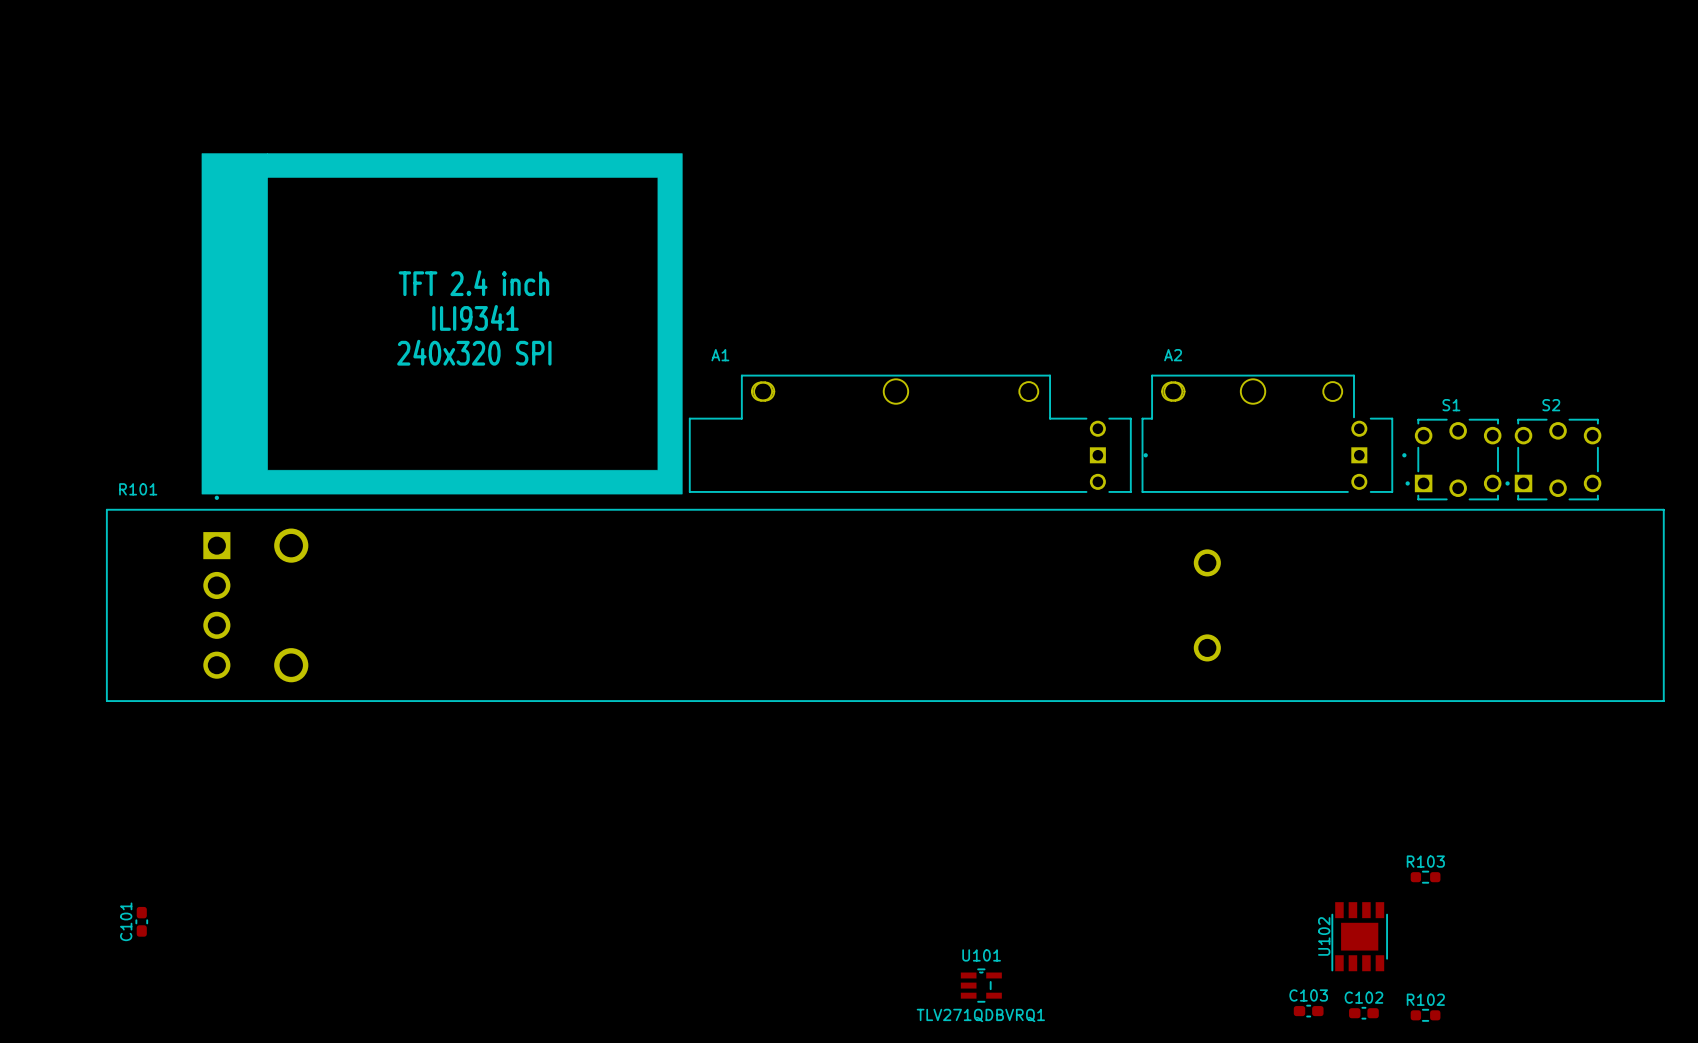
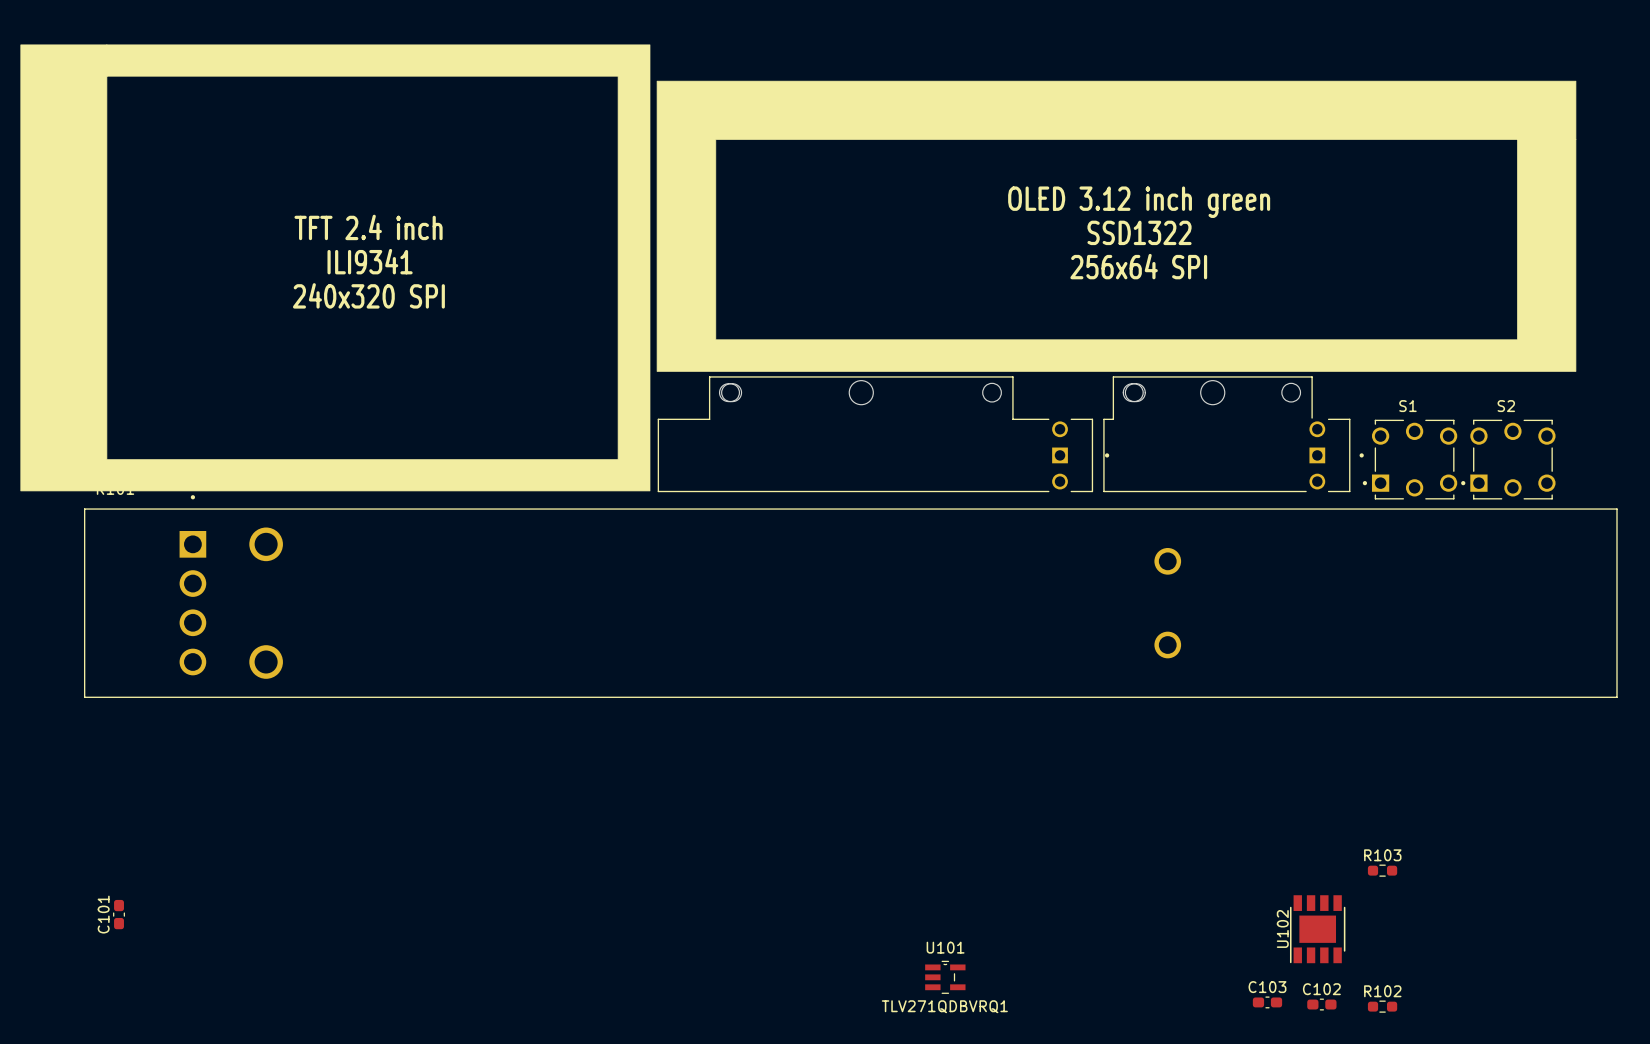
drawing: none -> [20, 44, 1577, 492]
drawing: [201, 153, 683, 495] -> none
text: none -> OLED 3.12 inch green (1139, 202)
text: none -> SSD1322 (1139, 232)
text: none -> 256x64 SPI (1138, 266)
text position: TFT 2.4 inch (473, 283) -> TFT 2.4 inch (368, 227)
text position: ILI9341 (475, 317) -> ILI9341 (370, 261)
text position: 240x320 SPI (474, 352) -> 240x320 SPI (368, 295)

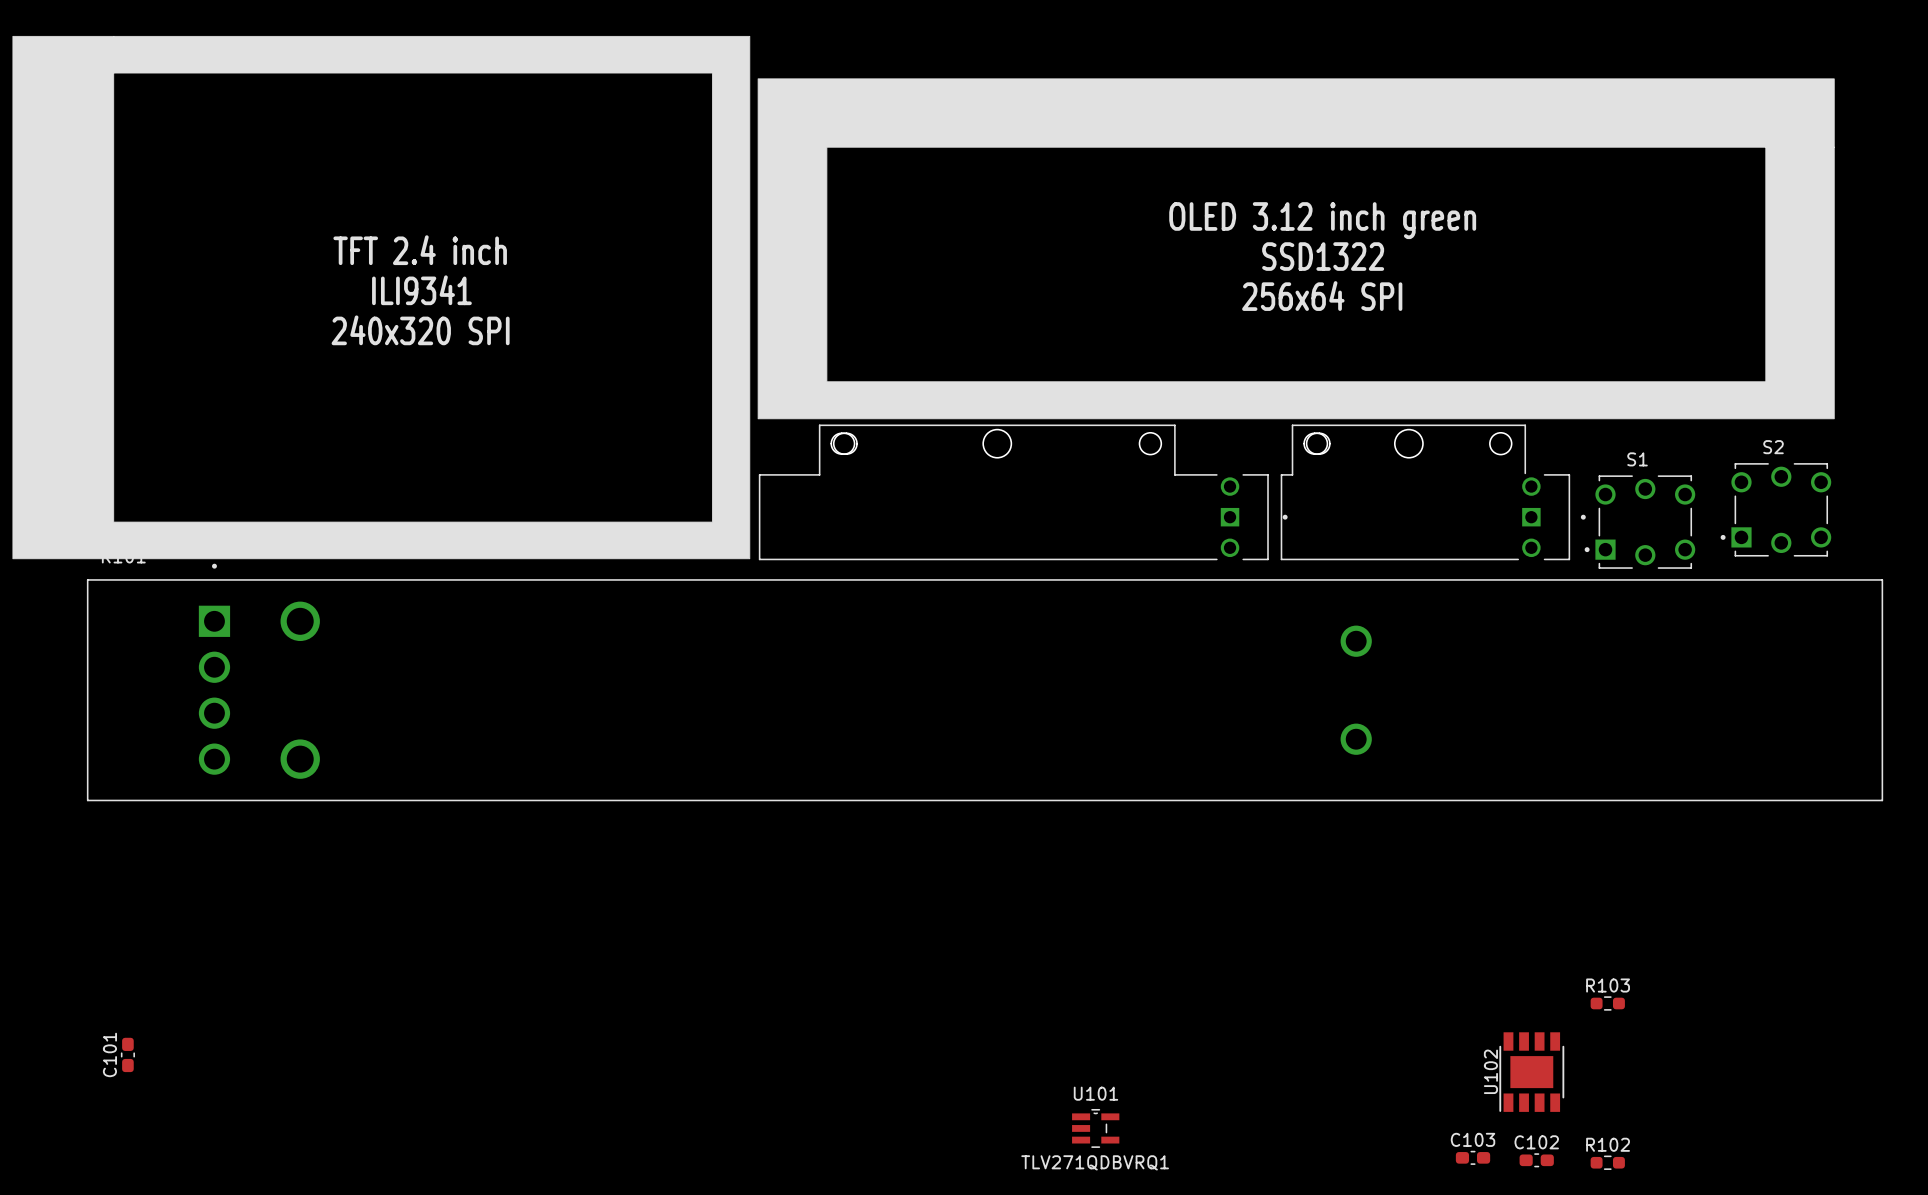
S2 position: (1508, 459) -> (1775, 509)

